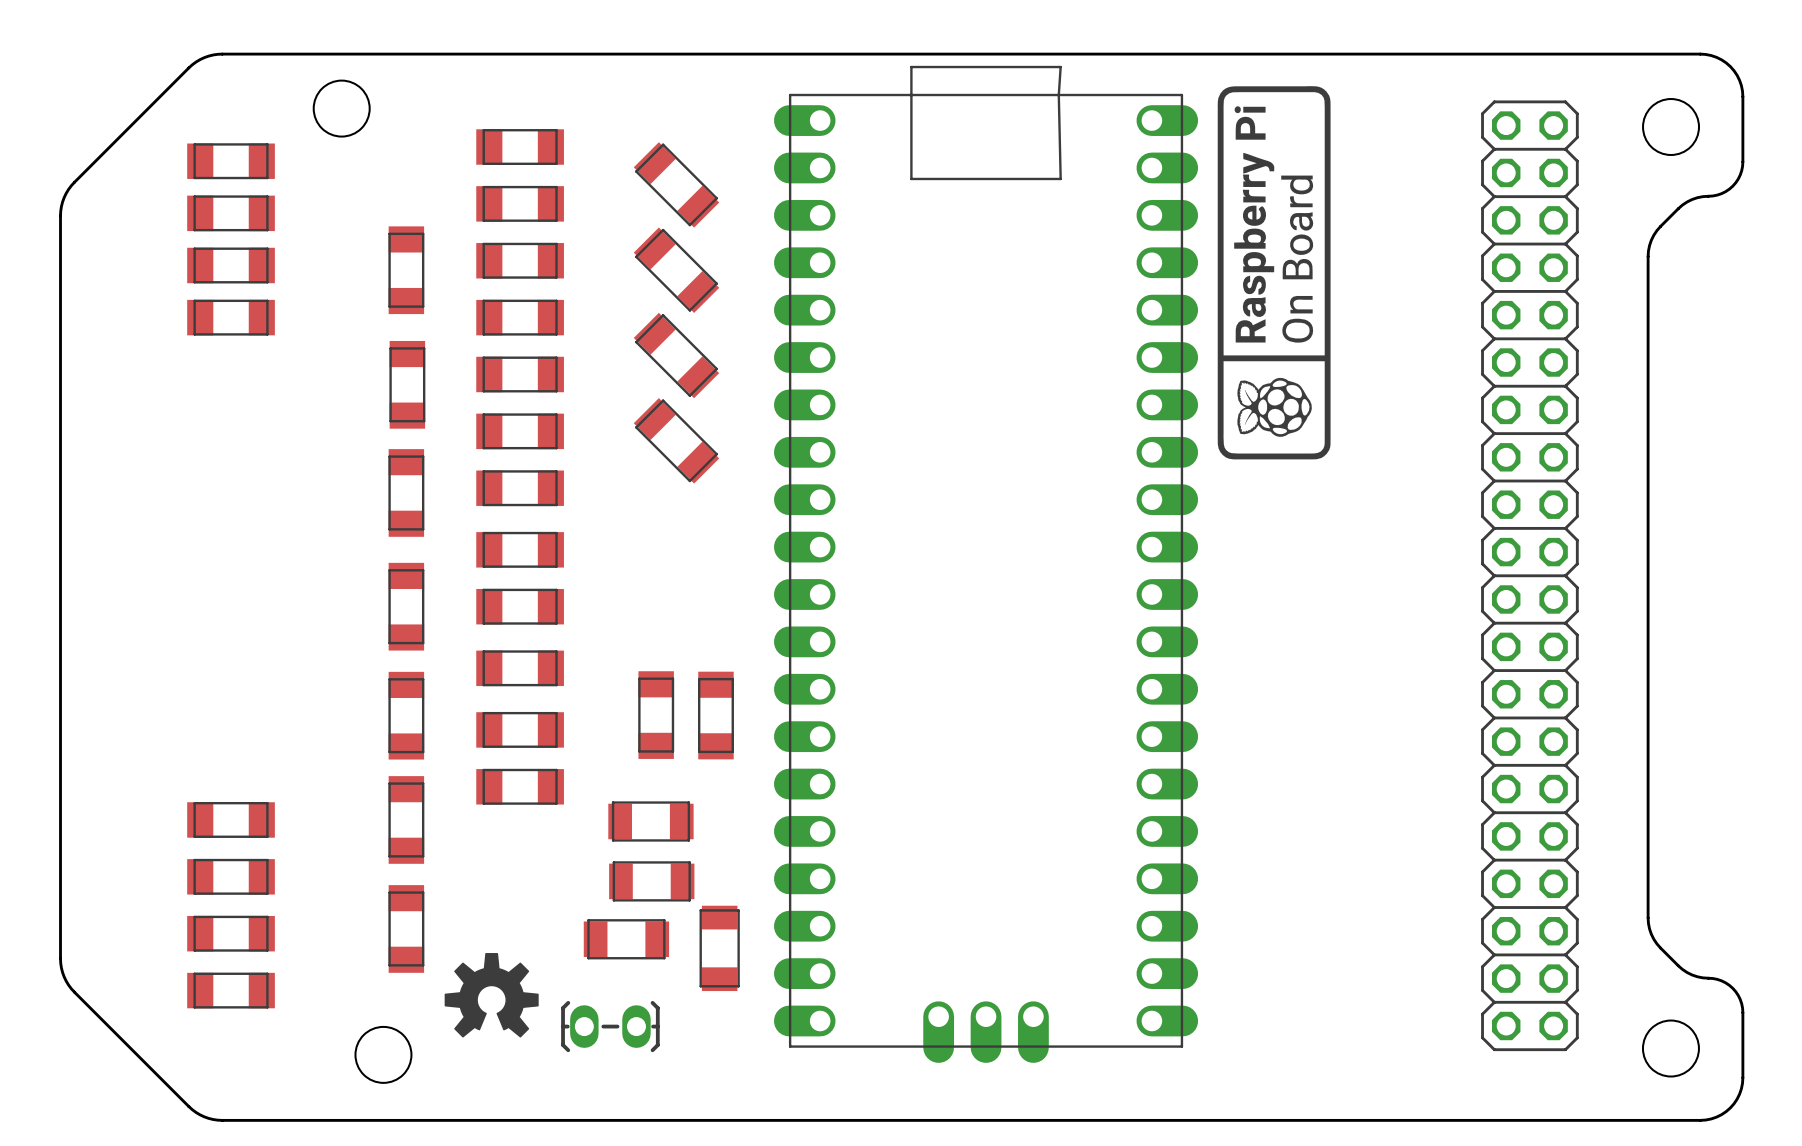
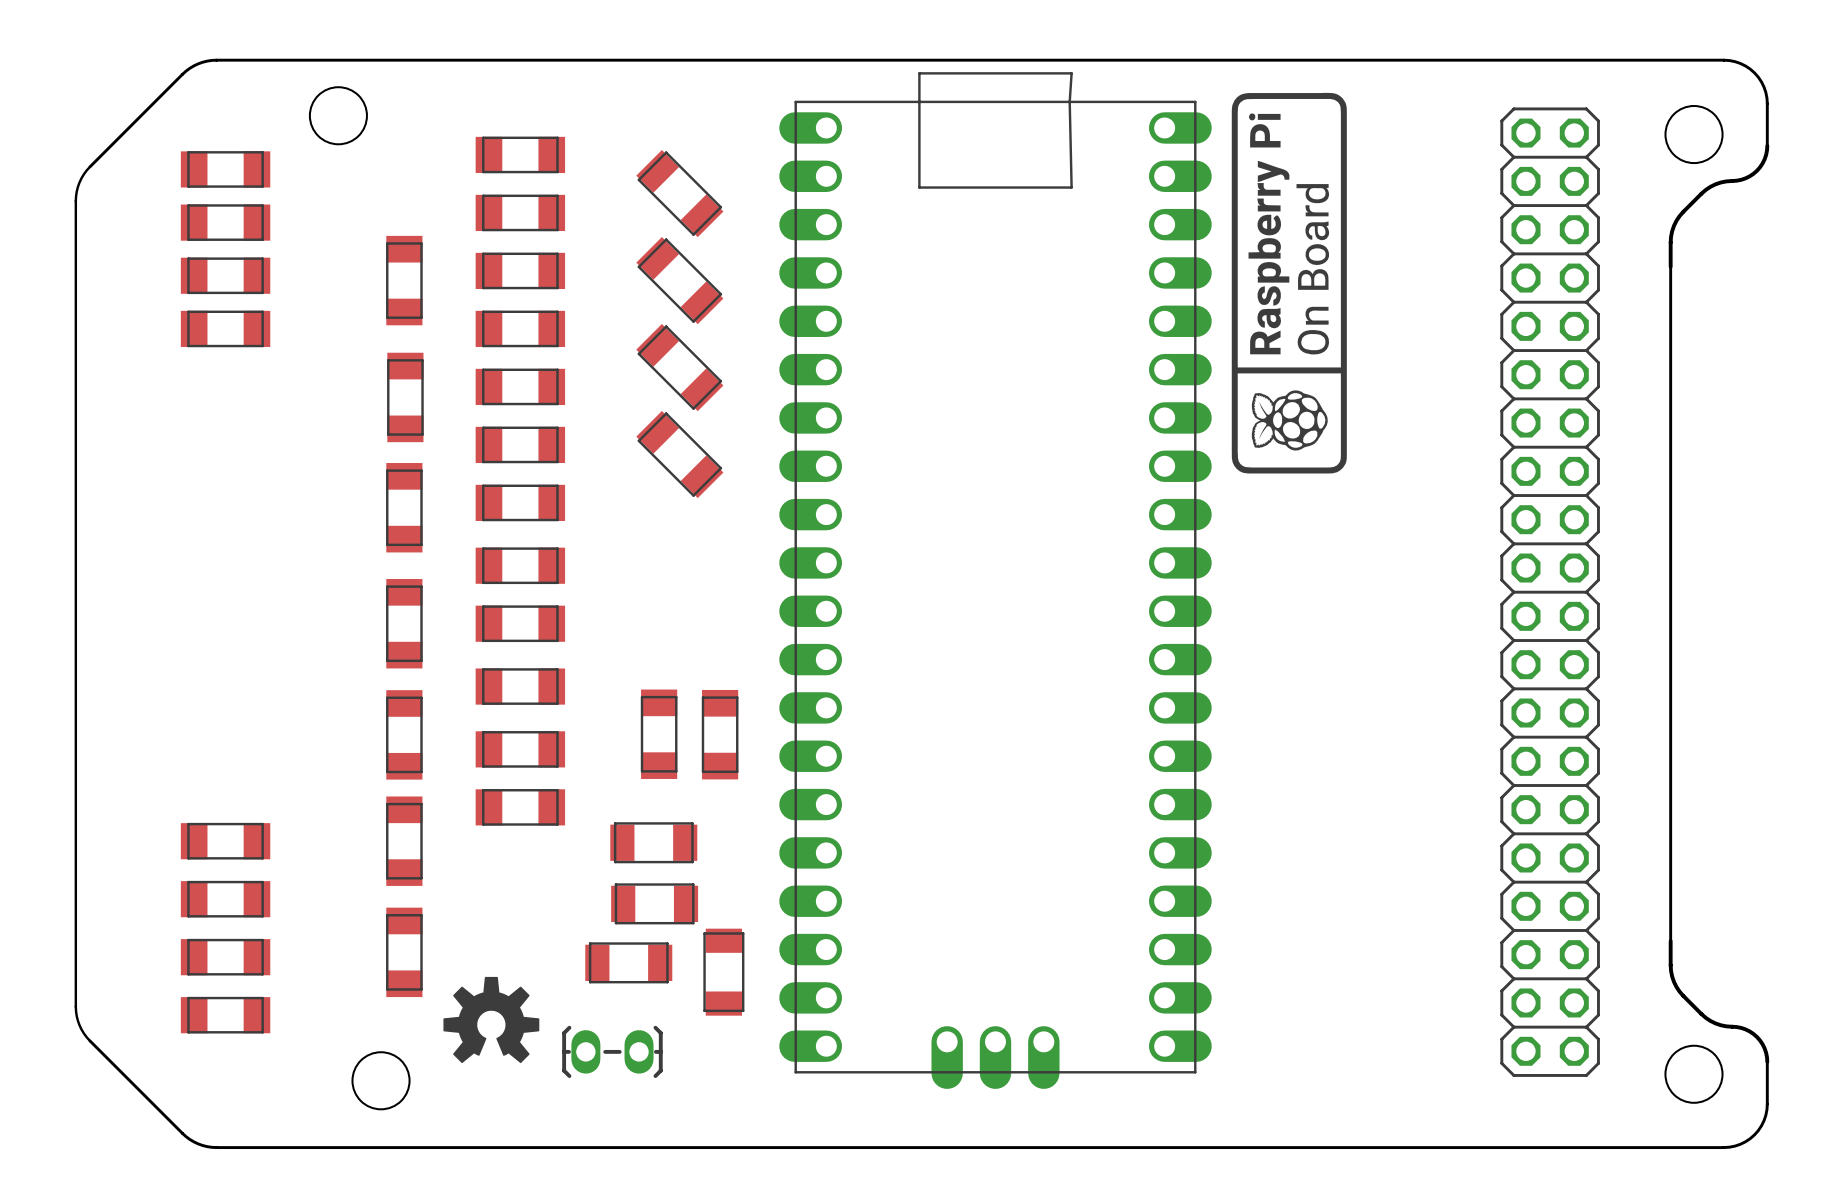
board edge: (1742, 138) (1742, 166) (1735, 182) (1721, 193) (1697, 197) (1682, 205) (1653, 235) (1648, 256) -> (1767, 145) (1764, 159) (1753, 173) (1741, 179) (1720, 182) (1710, 186) (1679, 216) (1671, 236) (1670, 266)
board edge: (98, 158) (68, 189) (62, 202) (60, 215) (60, 958) (62, 972) (68, 984) (98, 1015) -> (89, 166) (79, 182) (75, 201) (75, 1006) (79, 1025) (89, 1040)
board edge: (1648, 917) (1653, 939) (1682, 969) (1697, 976) (1721, 980) (1735, 991) (1742, 1008) (1742, 1036) -> (1670, 941) (1671, 970) (1679, 991) (1710, 1020) (1720, 1025) (1741, 1027) (1753, 1034) (1764, 1048) (1767, 1061)

